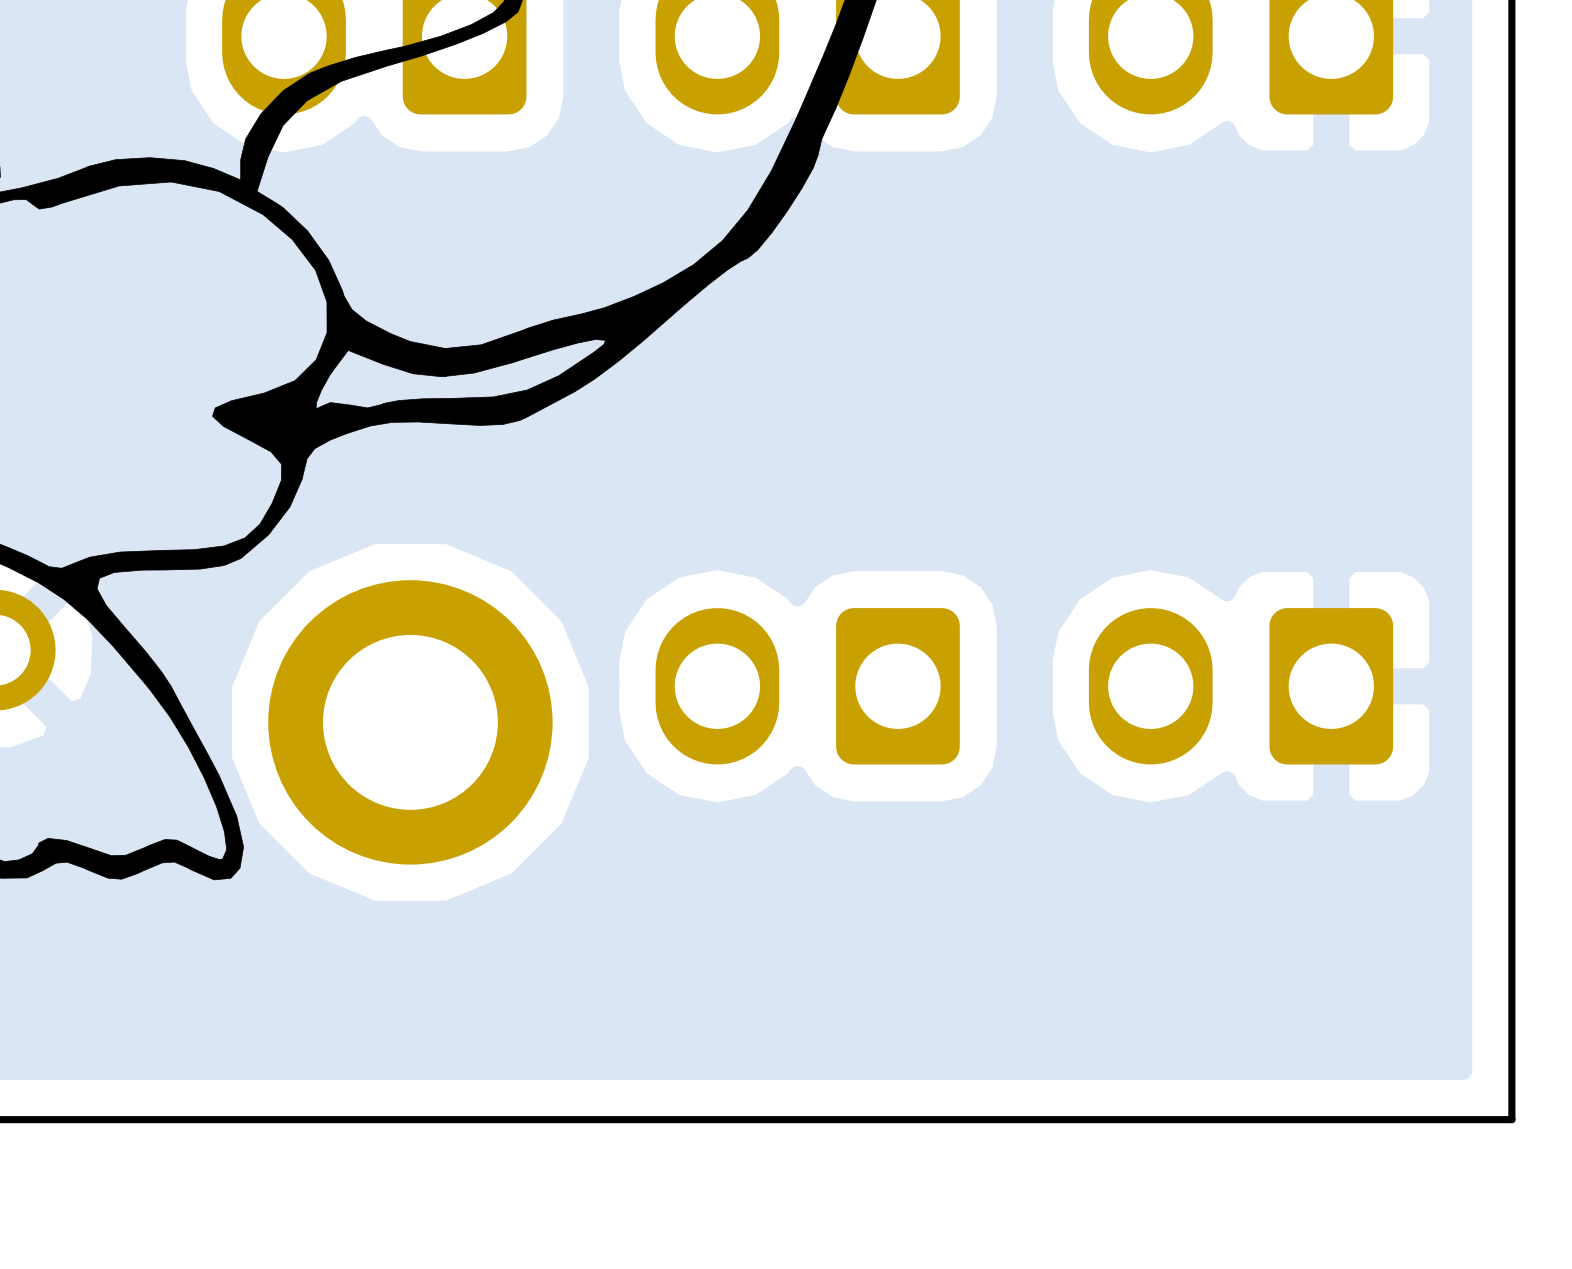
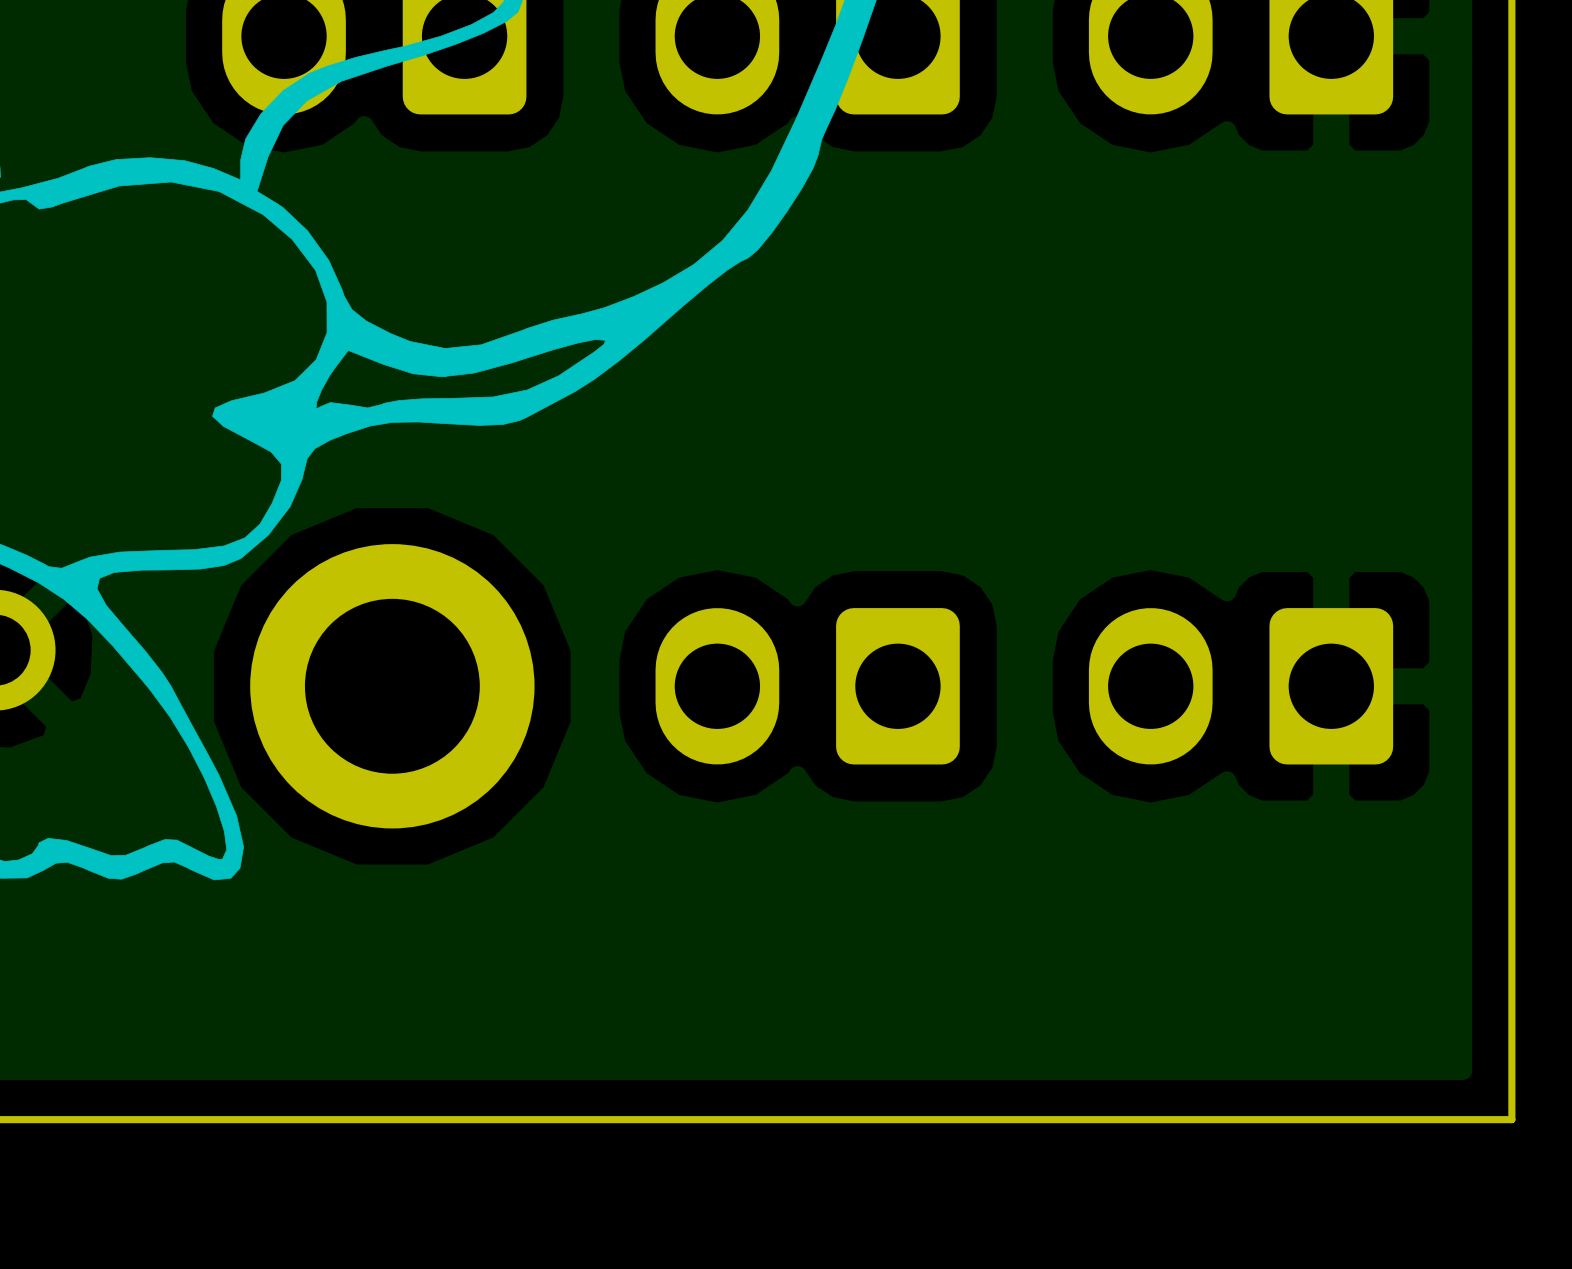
part position: (410, 722) -> (392, 686)

